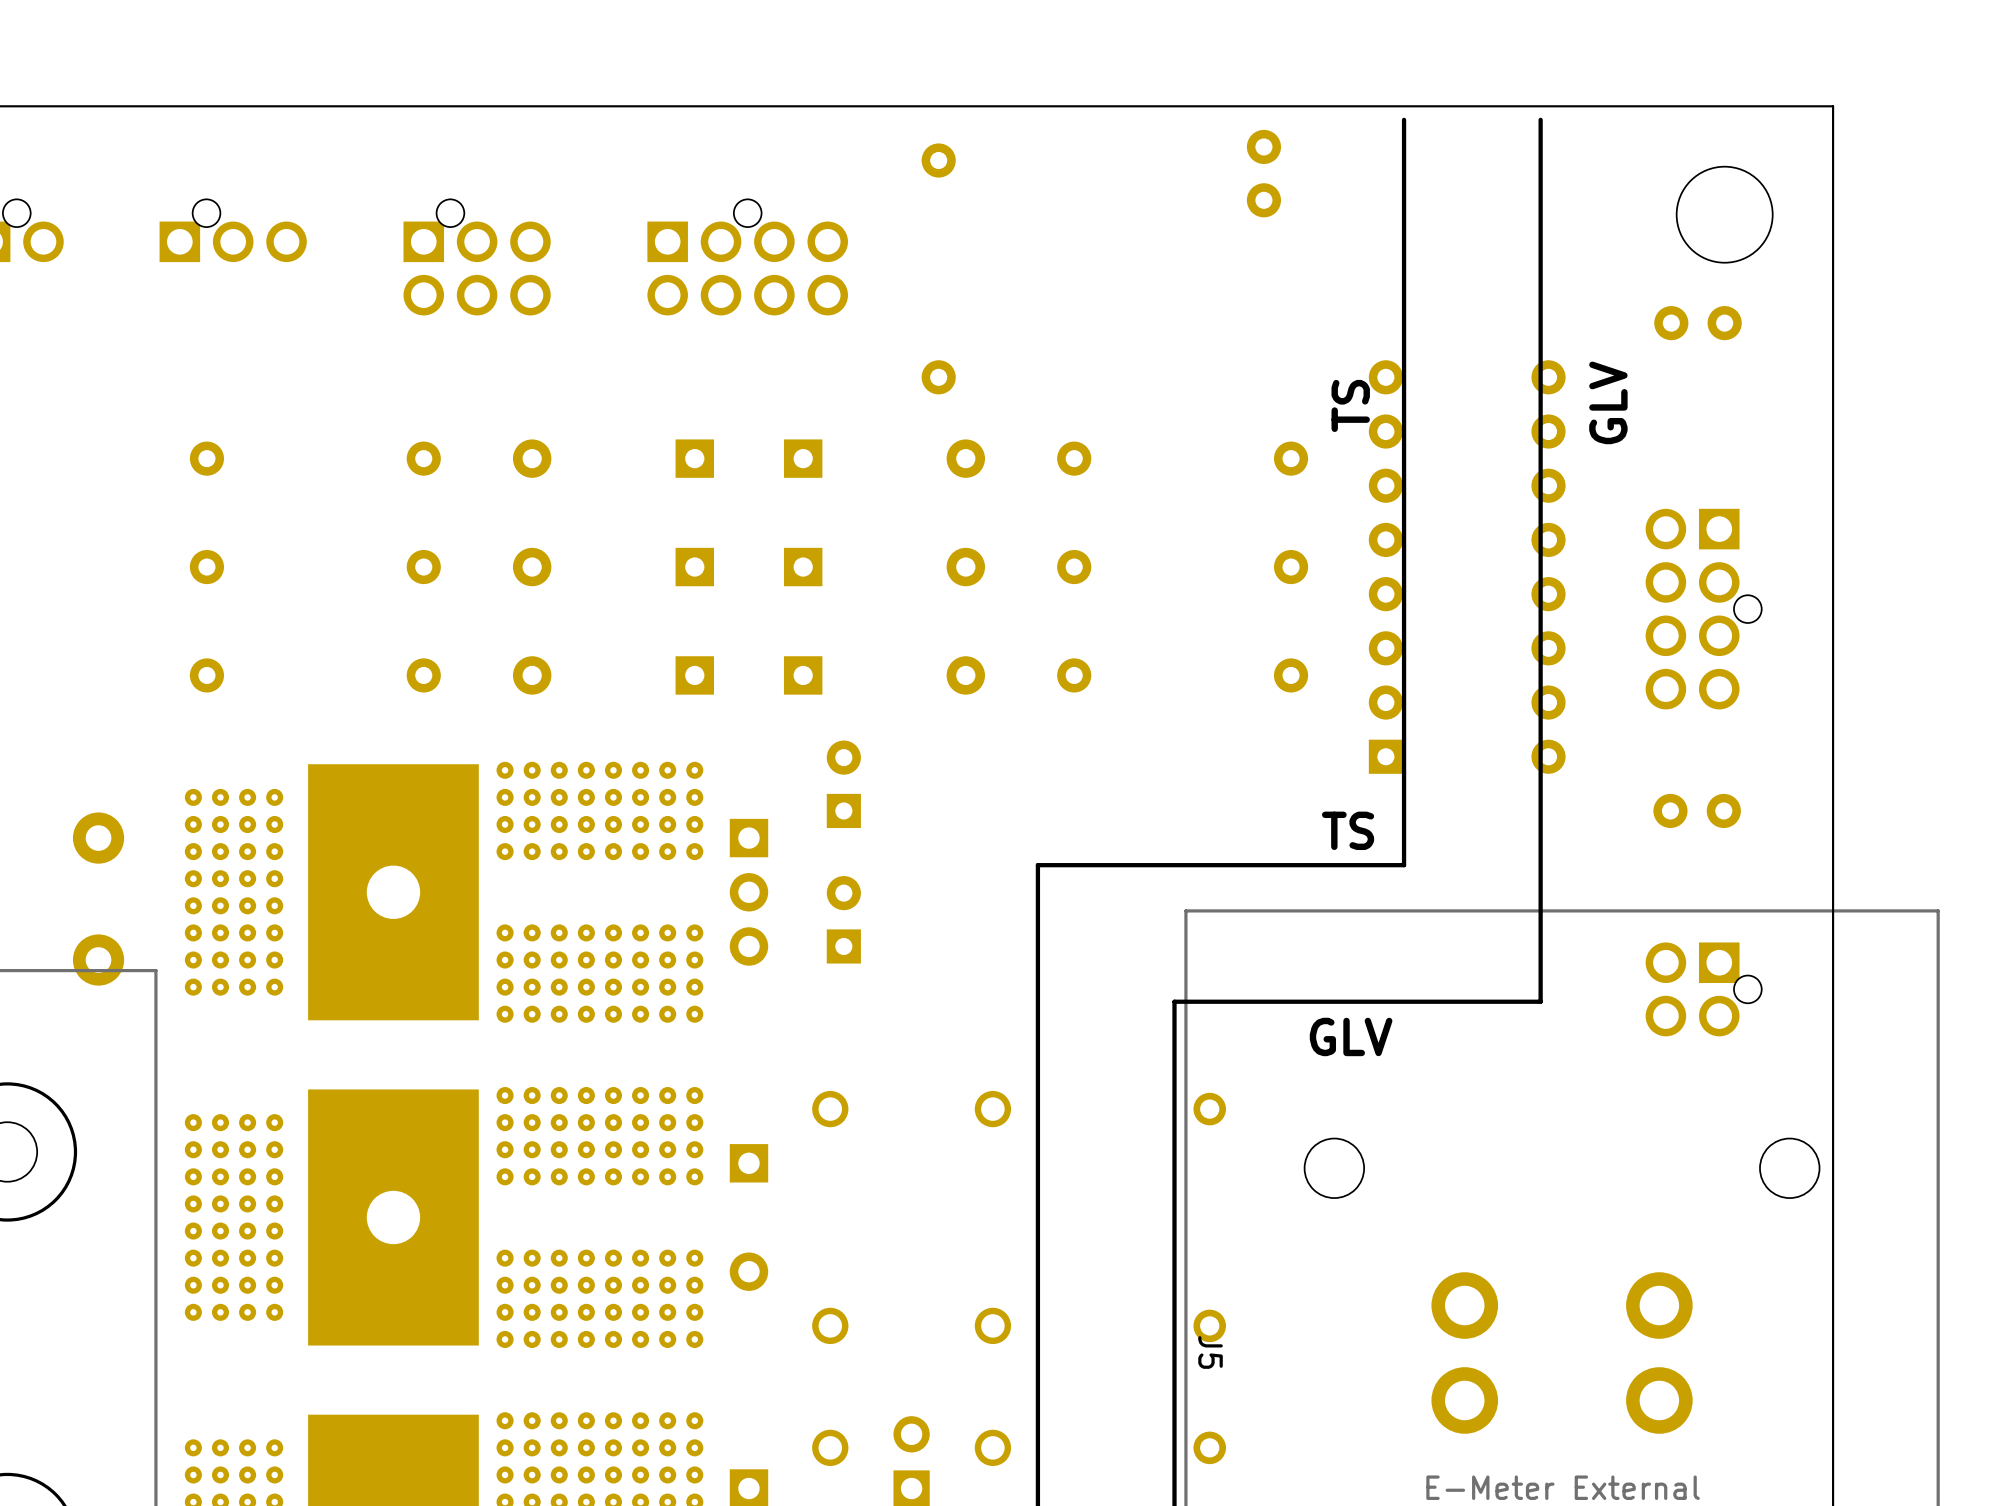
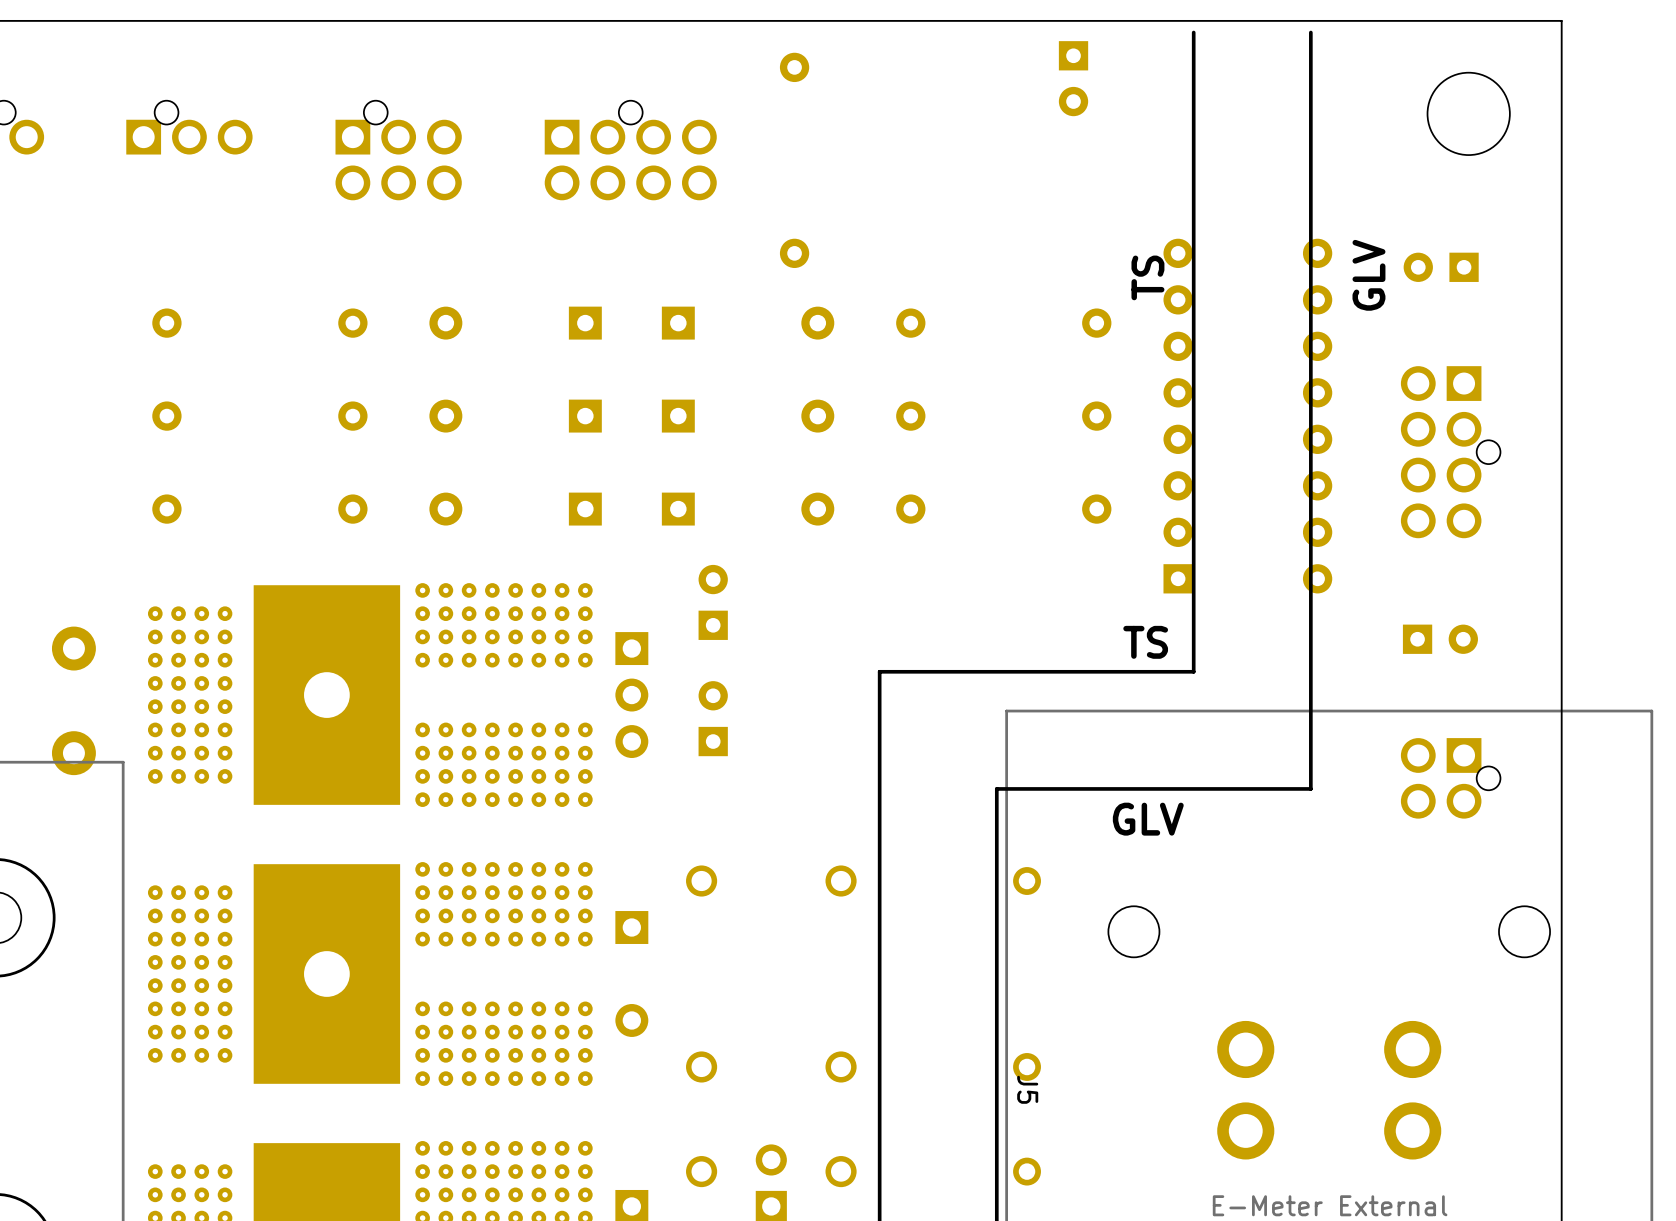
part footprint: [1246, 129, 1282, 218] -> [1058, 41, 1089, 117]
part: (1697, 323) -> none
part: none -> (1441, 267)
part footprint: [1653, 793, 1741, 829] -> [1402, 624, 1478, 654]

